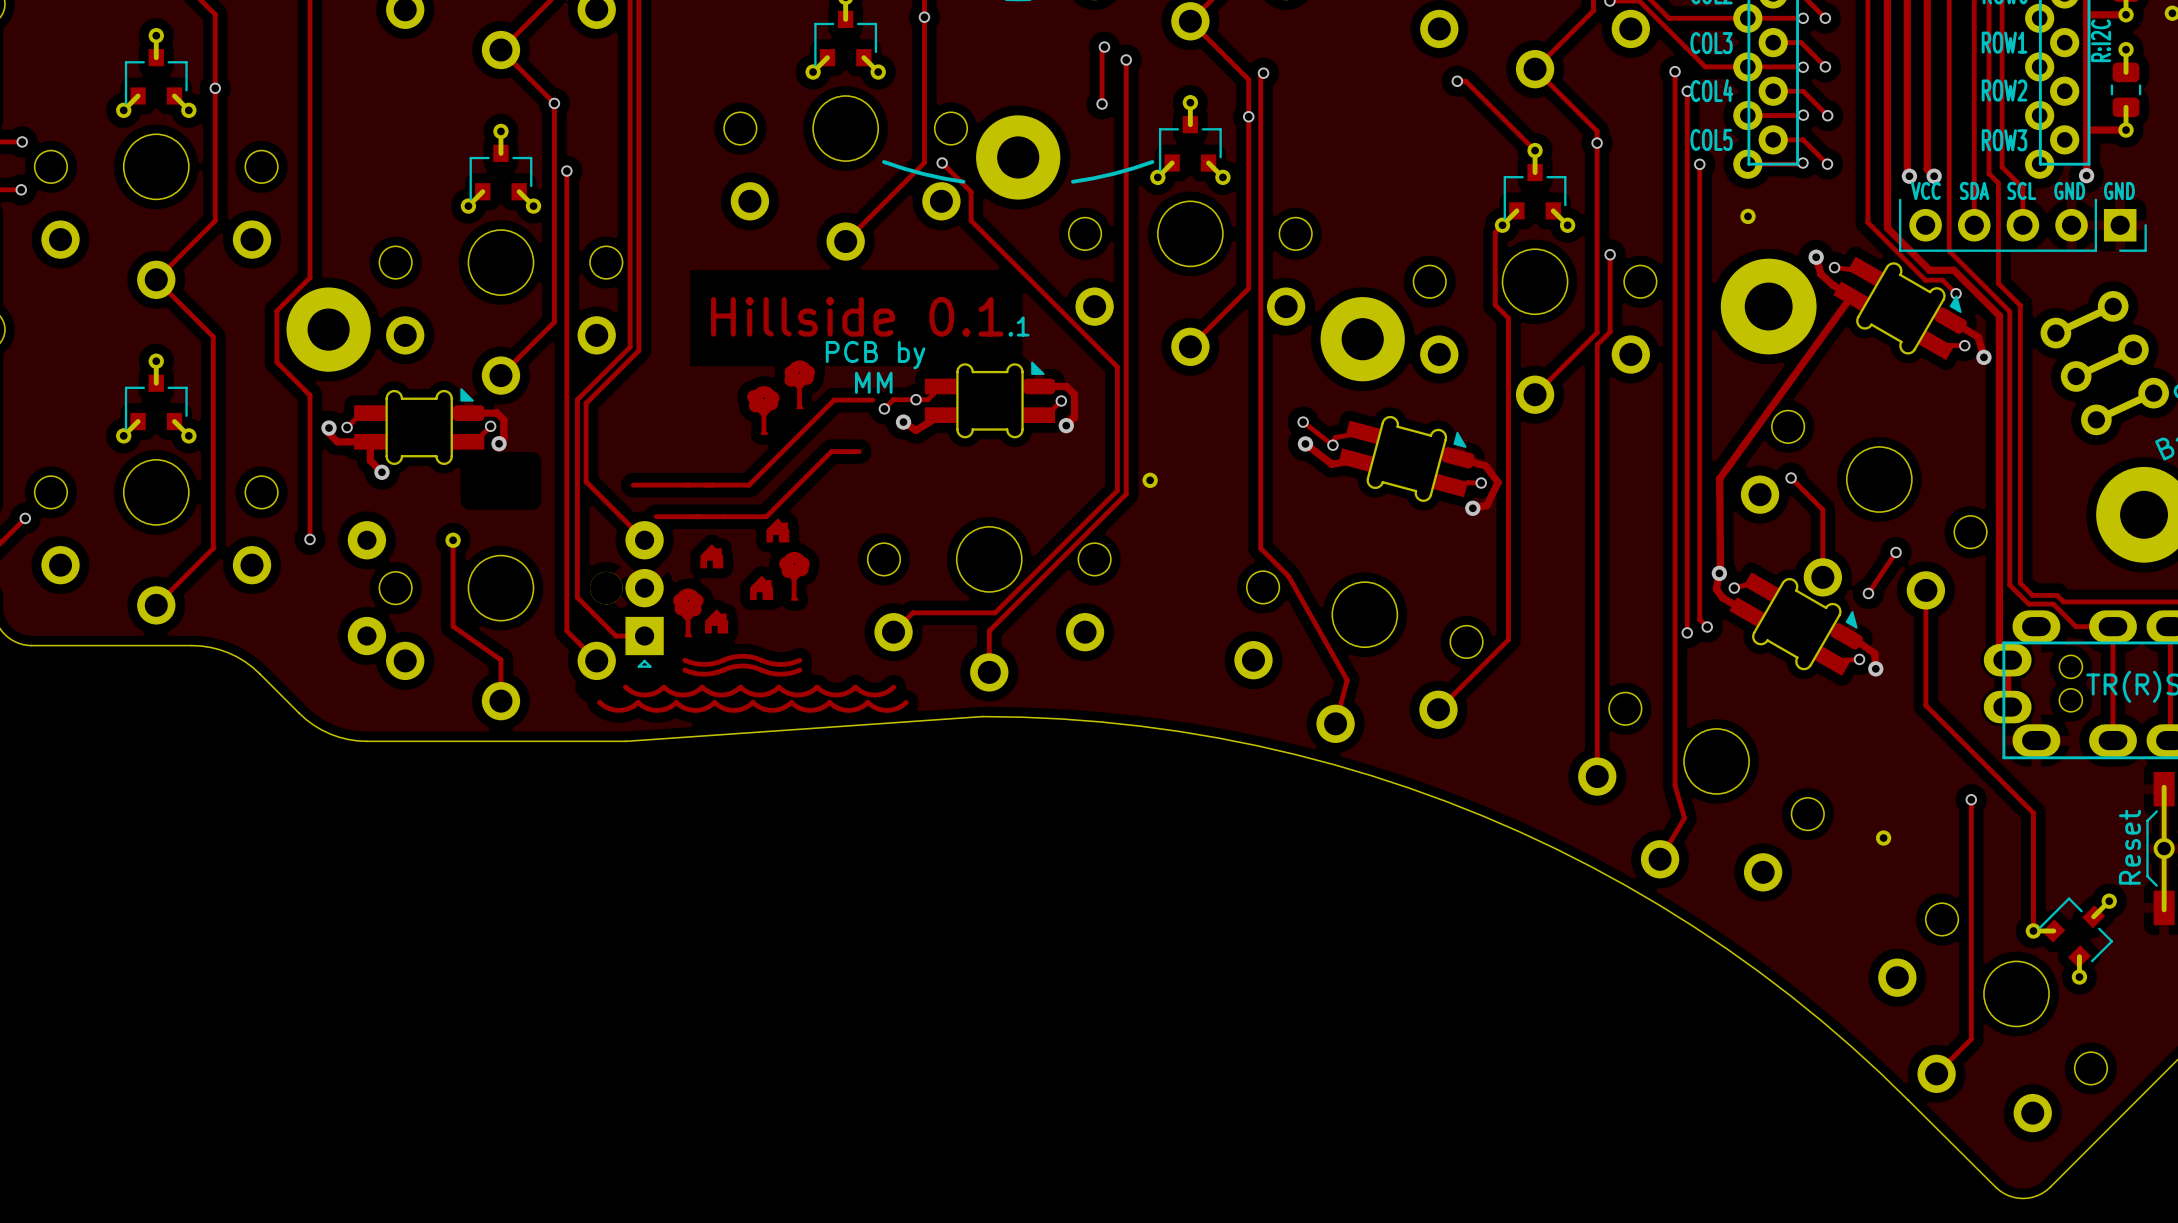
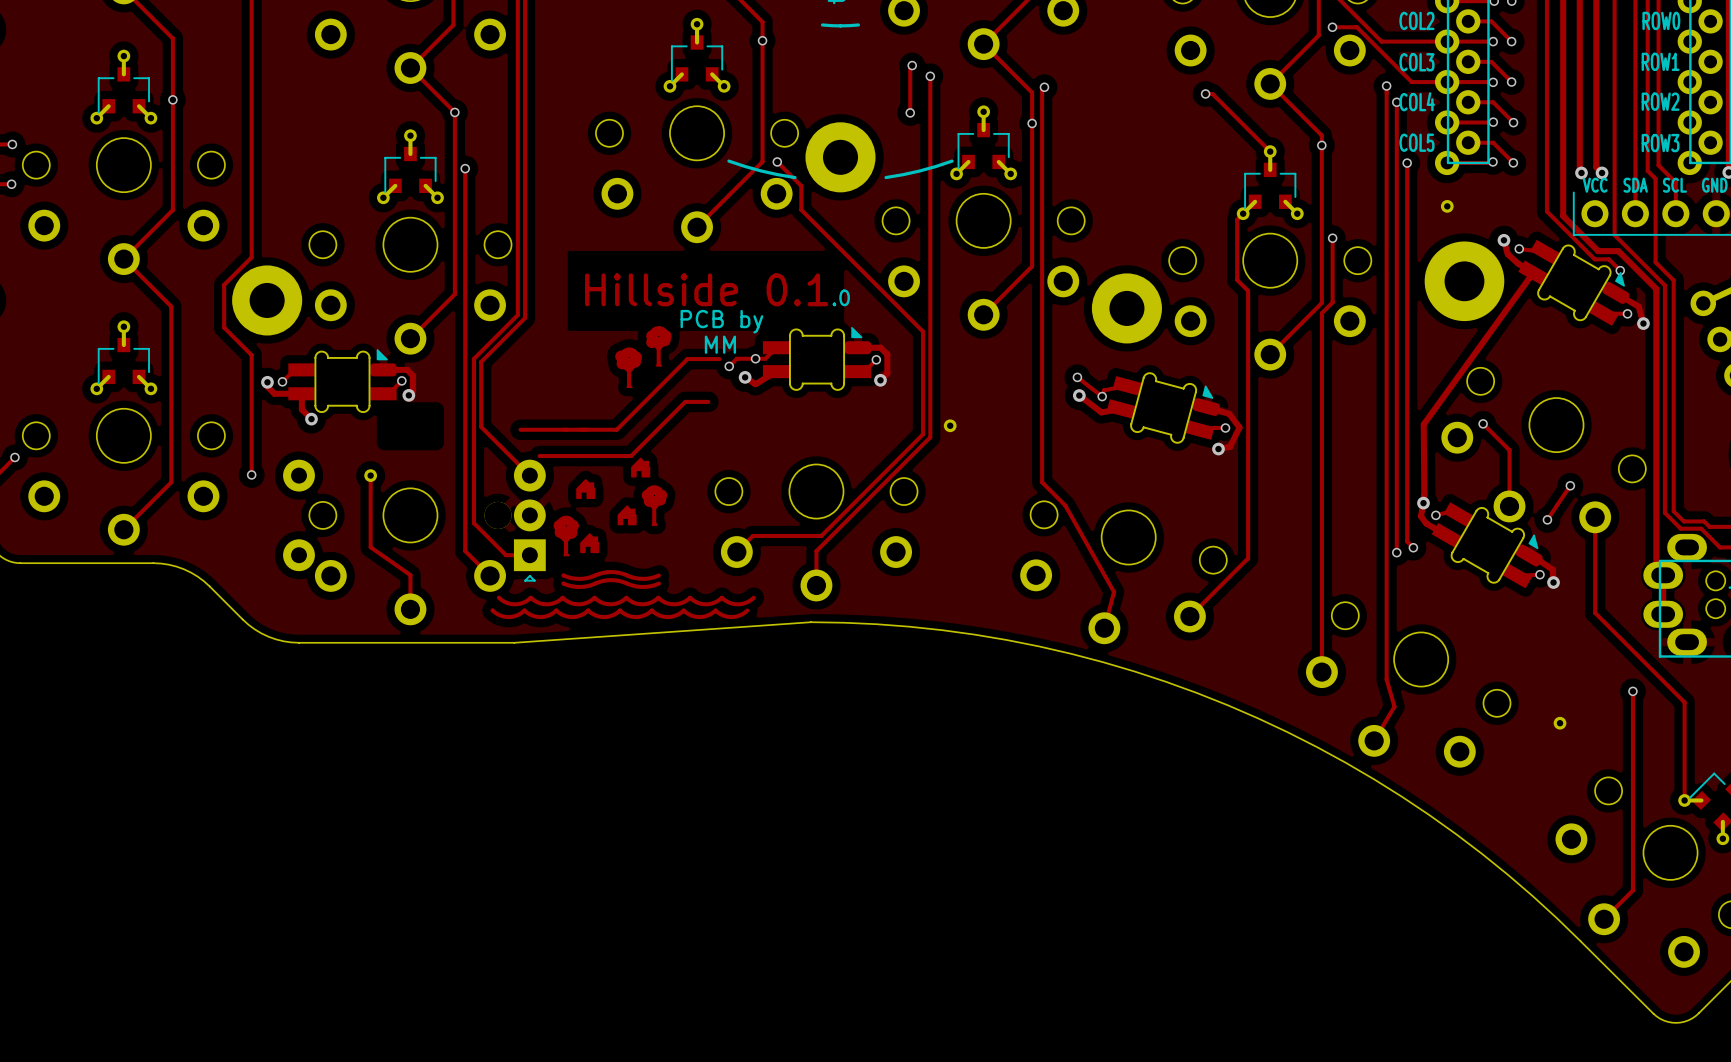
text: .1 (1019, 326) -> .0 (841, 297)
part footprint: [597, 360, 909, 713] -> [490, 326, 756, 620]

